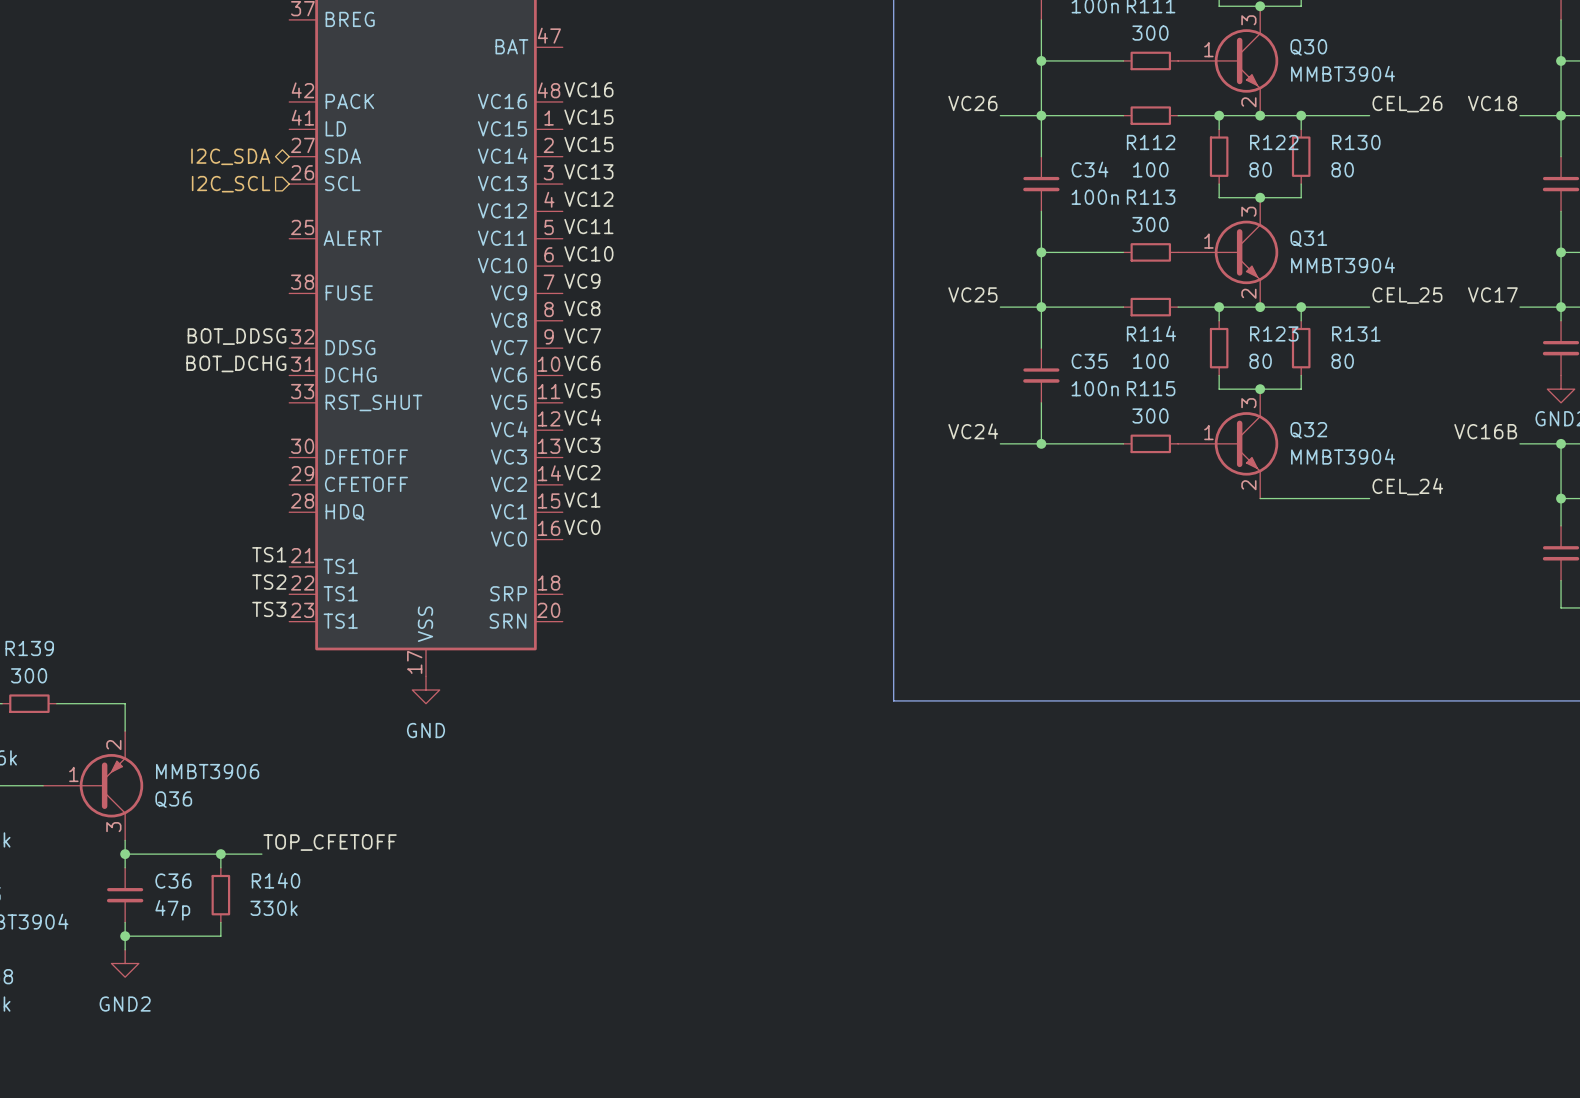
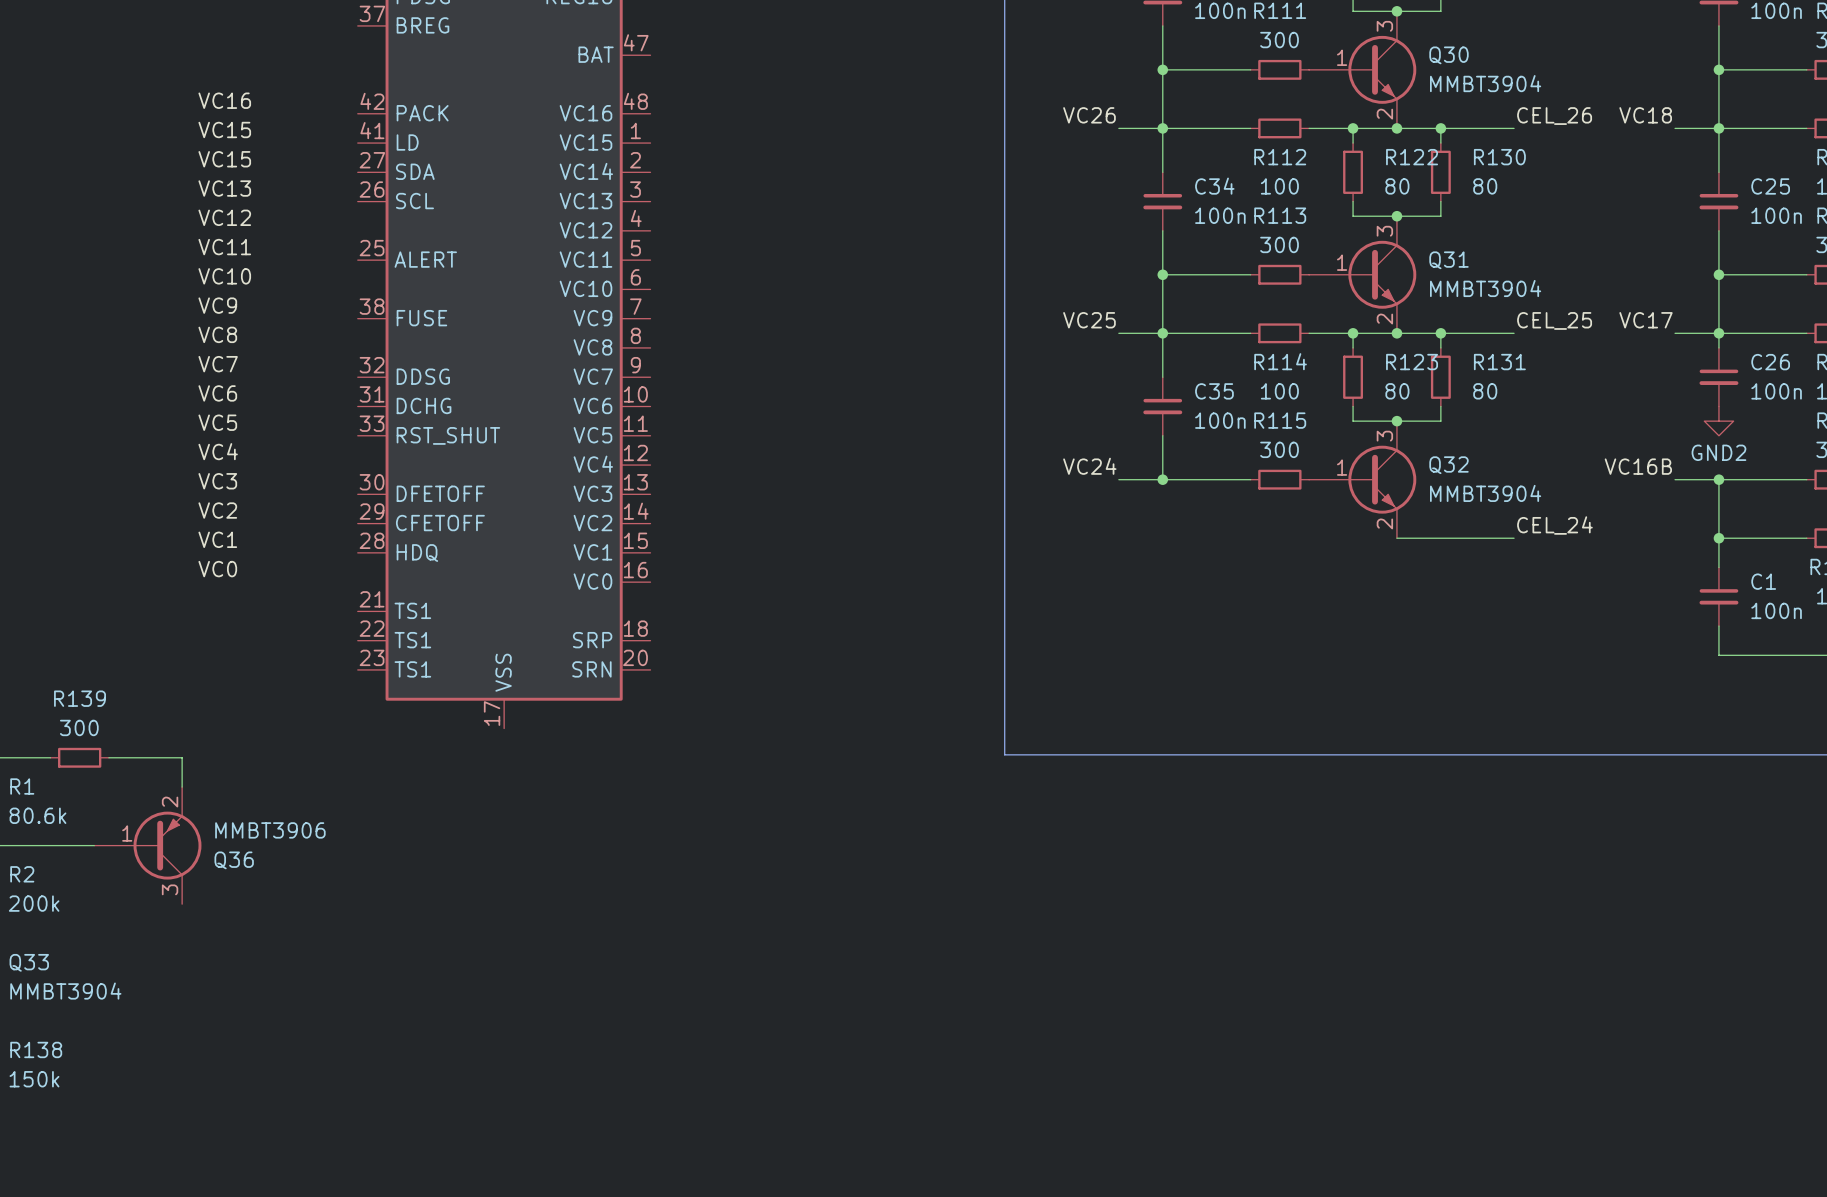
label: none -> VC16 (224, 100)
label: VC16 (588, 89) -> none
label: none -> VC15 (224, 129)
label: VC15 (588, 117) -> none
label: none -> VC15 (224, 159)
label: VC15 (588, 144) -> none
hierarchical label: I2C_SDA (230, 156) -> none
label: none -> VC13 (224, 188)
label: VC13 (588, 171) -> none
hierarchical label: I2C_SCL (231, 184) -> none
label: none -> VC12 (224, 217)
label: VC12 (588, 199) -> none
label: none -> VC11 (224, 247)
label: VC11 (588, 226) -> none
label: none -> VC10 (224, 276)
label: VC10 (588, 253) -> none
label: none -> VC9 (217, 305)
label: VC9 (582, 281) -> none
label: none -> VC8 (217, 334)
label: VC8 (582, 308) -> none
label: none -> VC7 (218, 364)
label: VC7 (582, 335) -> none
label: BOT_DDSG (237, 336) -> none
label: none -> VC6 (217, 393)
label: BOT_DCHG (236, 363) -> none
label: VC6 (582, 363) -> none
label: none -> VC5 (217, 422)
label: VC5 (582, 390) -> none
label: none -> VC4 (218, 451)
label: VC4 (582, 417) -> none
label: none -> VC3 (217, 481)
label: VC3 (582, 445) -> none
label: none -> VC2 (217, 510)
label: VC2 (582, 472) -> none
label: none -> VC1 (217, 539)
label: VC1 (582, 500) -> none
label: none -> VC0 (217, 569)
label: VC0 (582, 527) -> none
label: TS1 (269, 554) -> none
label: TS2 (269, 582) -> none
label: TS3 (269, 609) -> none
power symbol: GND (425, 690) -> none
wire: (125, 840) (125, 867) -> none
label: TOP_CFETOFF (330, 842) -> none
wire: (125, 854) (261, 854) -> none
junction: (125, 854) -> none
wire: (220, 854) (220, 867) -> none
junction: (220, 854) -> none
C36: 47p (125, 895) -> none
R140: 330k (220, 895) -> none
wire: (125, 922) (125, 949) -> none
wire: (220, 922) (220, 936) (125, 936) -> none
junction: (125, 936) -> none
power symbol: GND2 (125, 963) -> none

